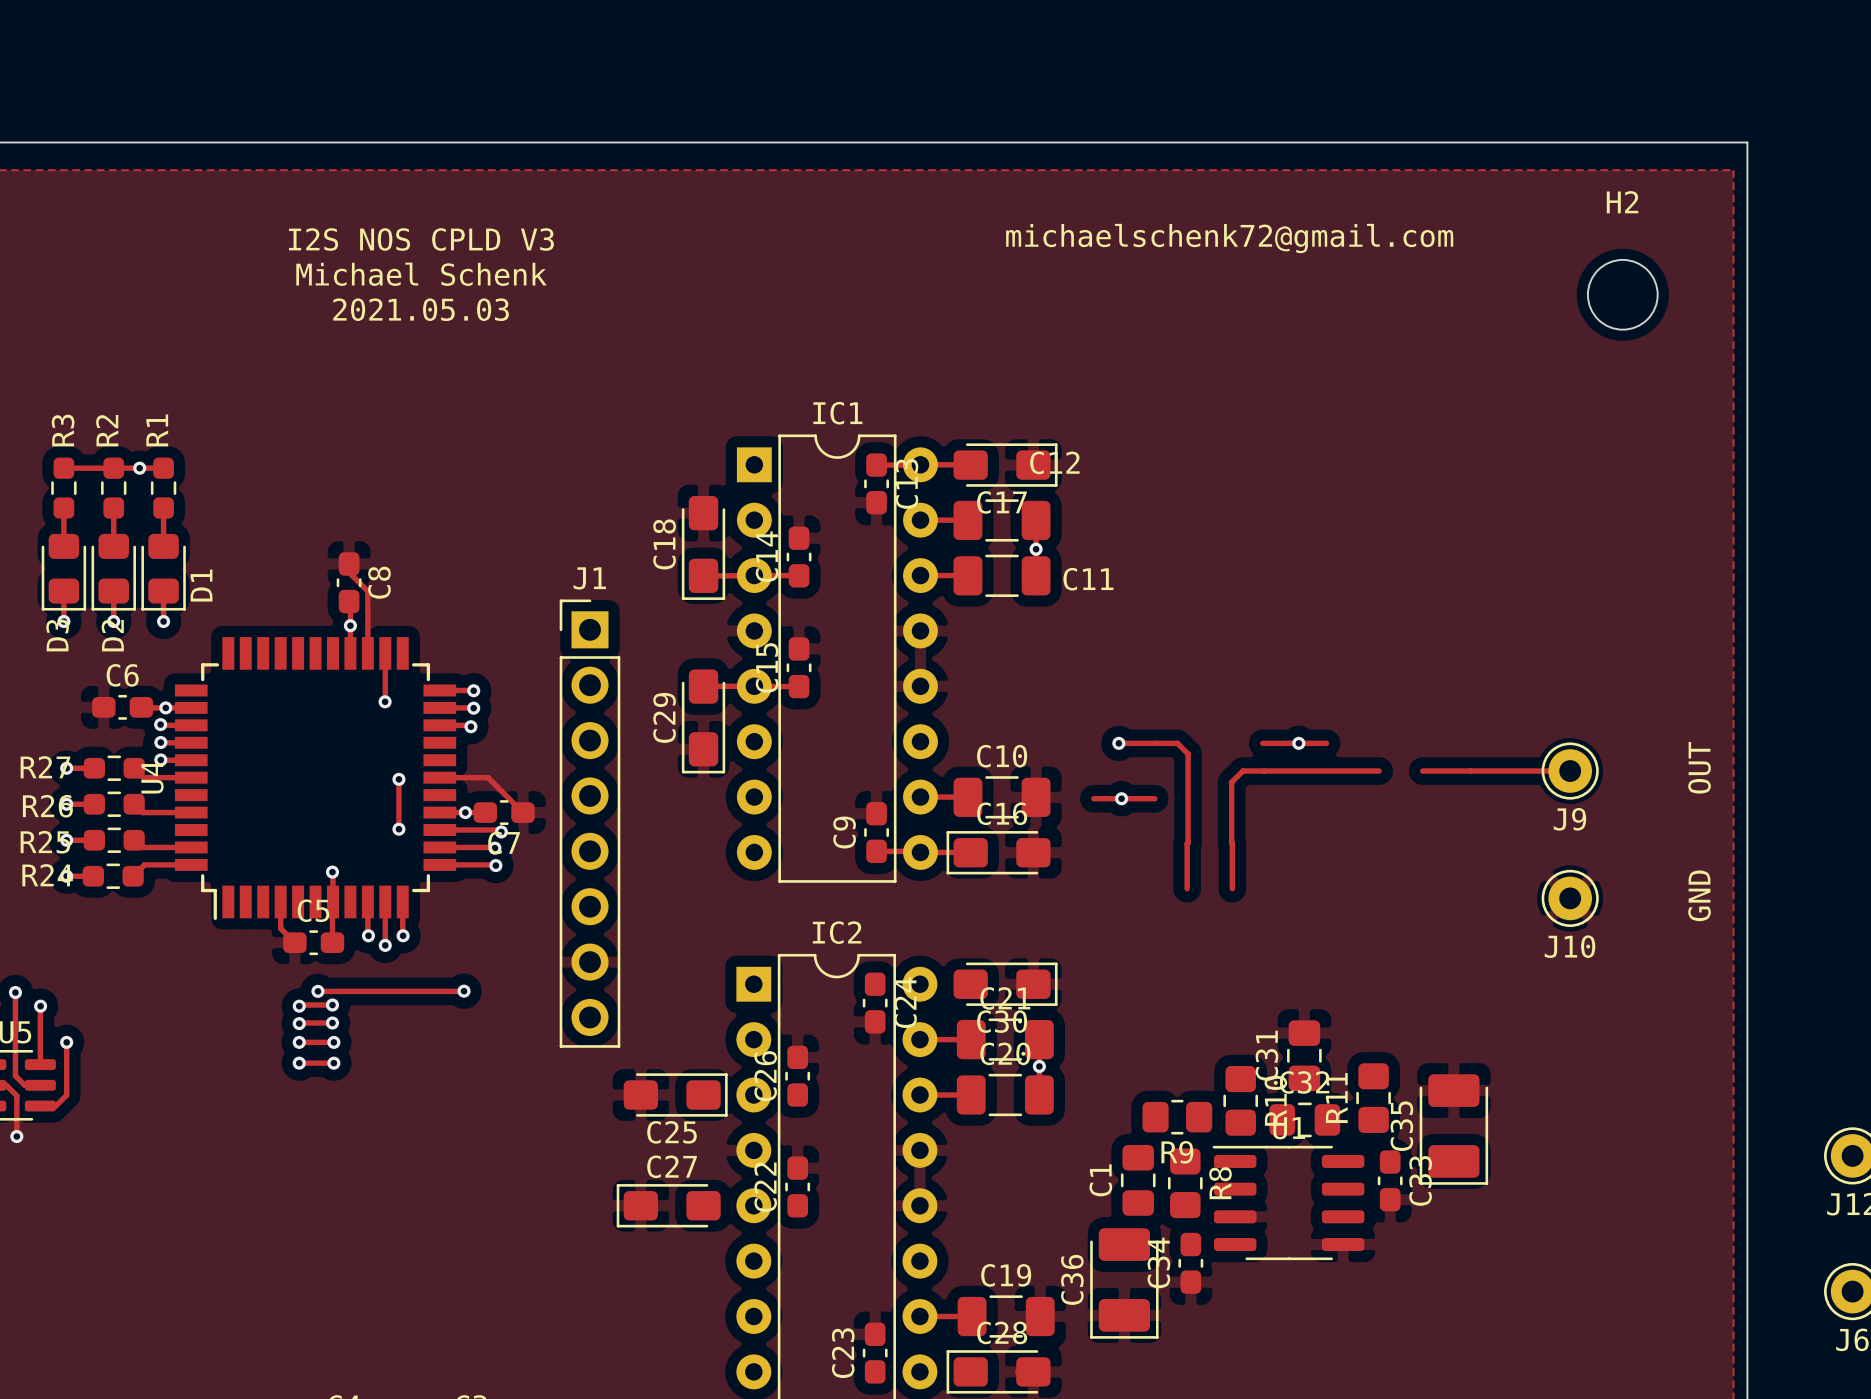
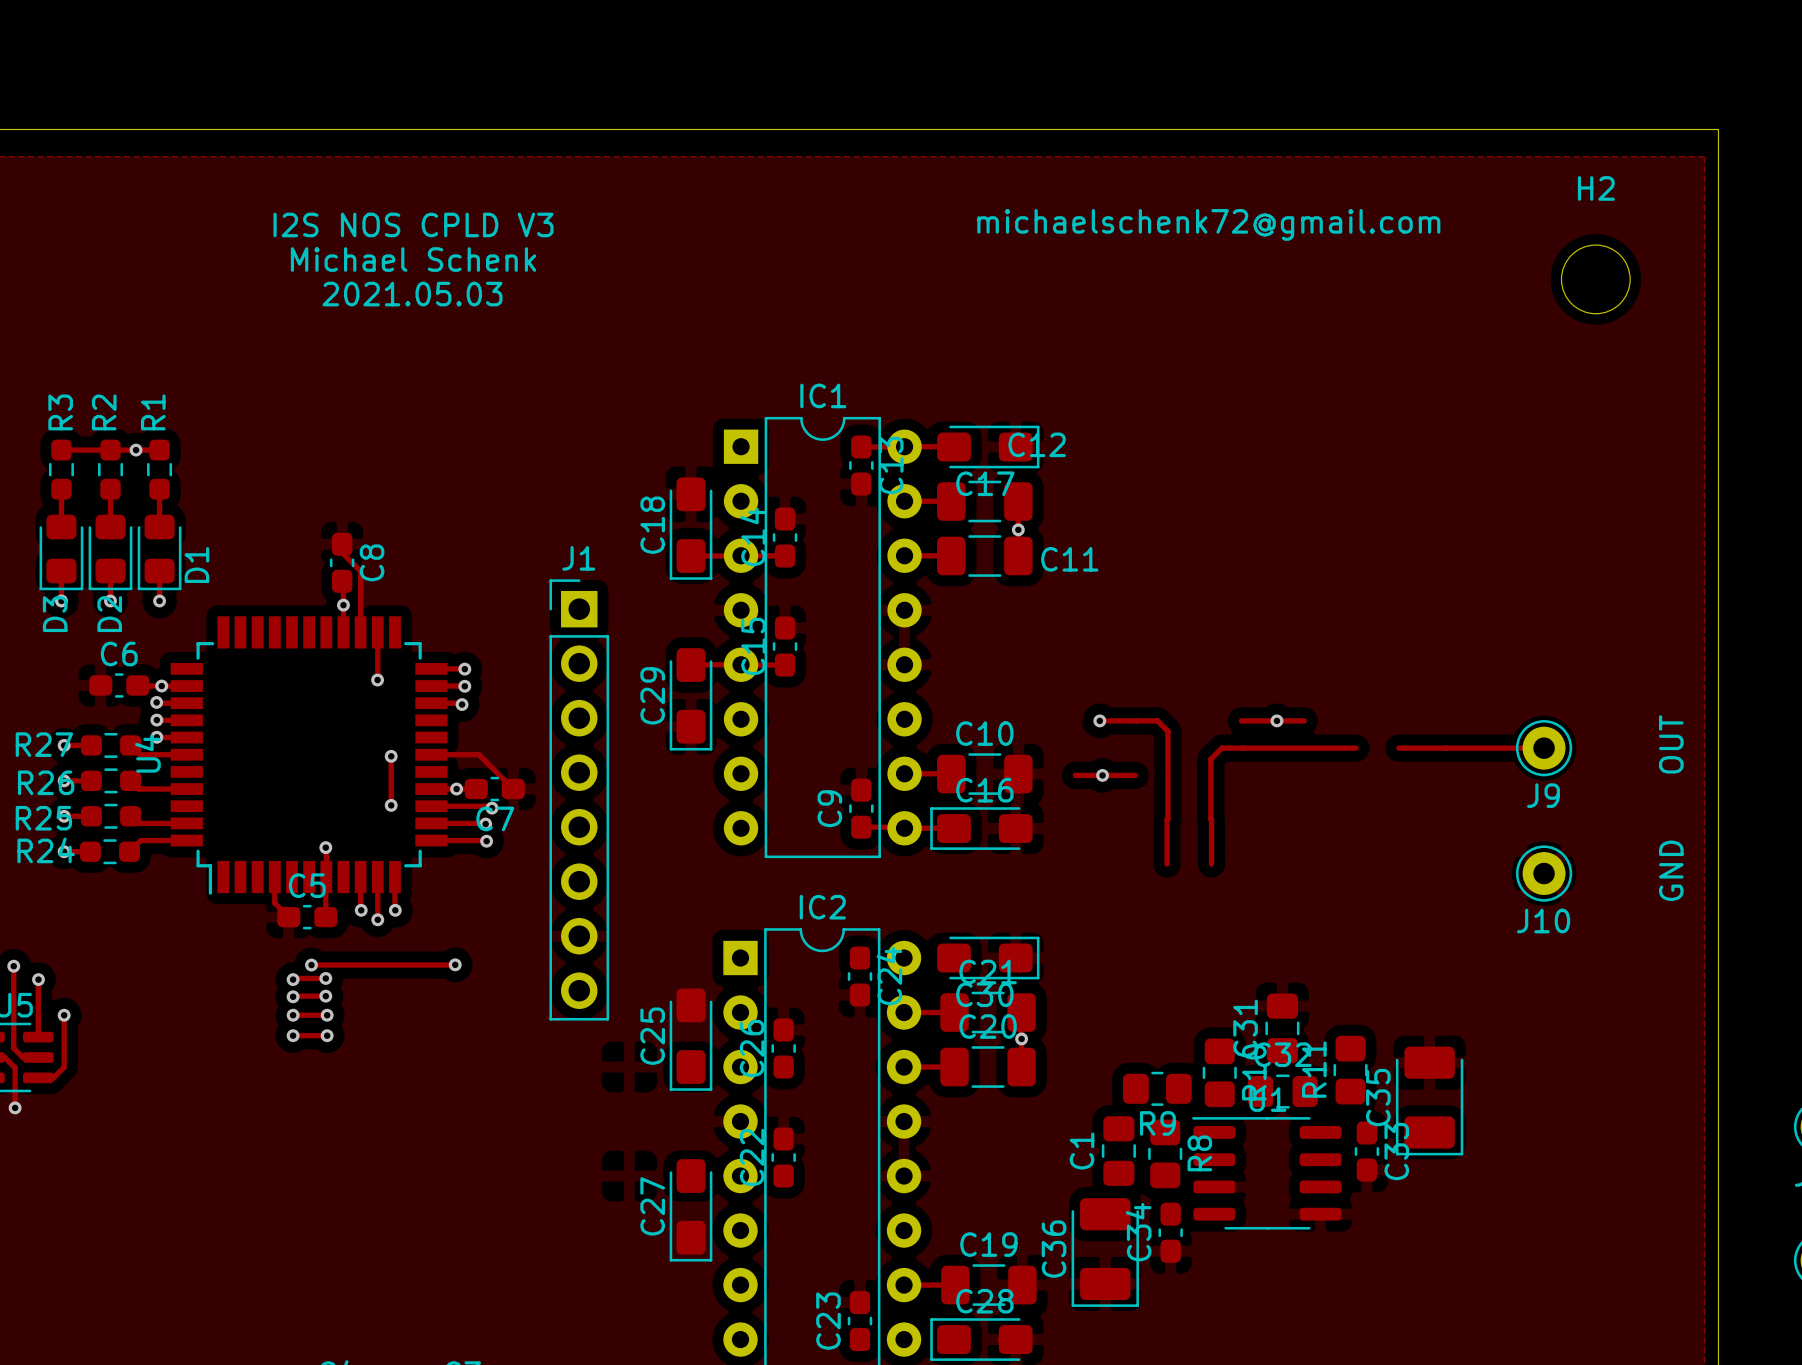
C25 rotation: 0° (675, 1094) -> 90° clockwise (691, 1039)
C27 rotation: 0° (668, 1205) -> 90° counterclockwise (691, 1210)

